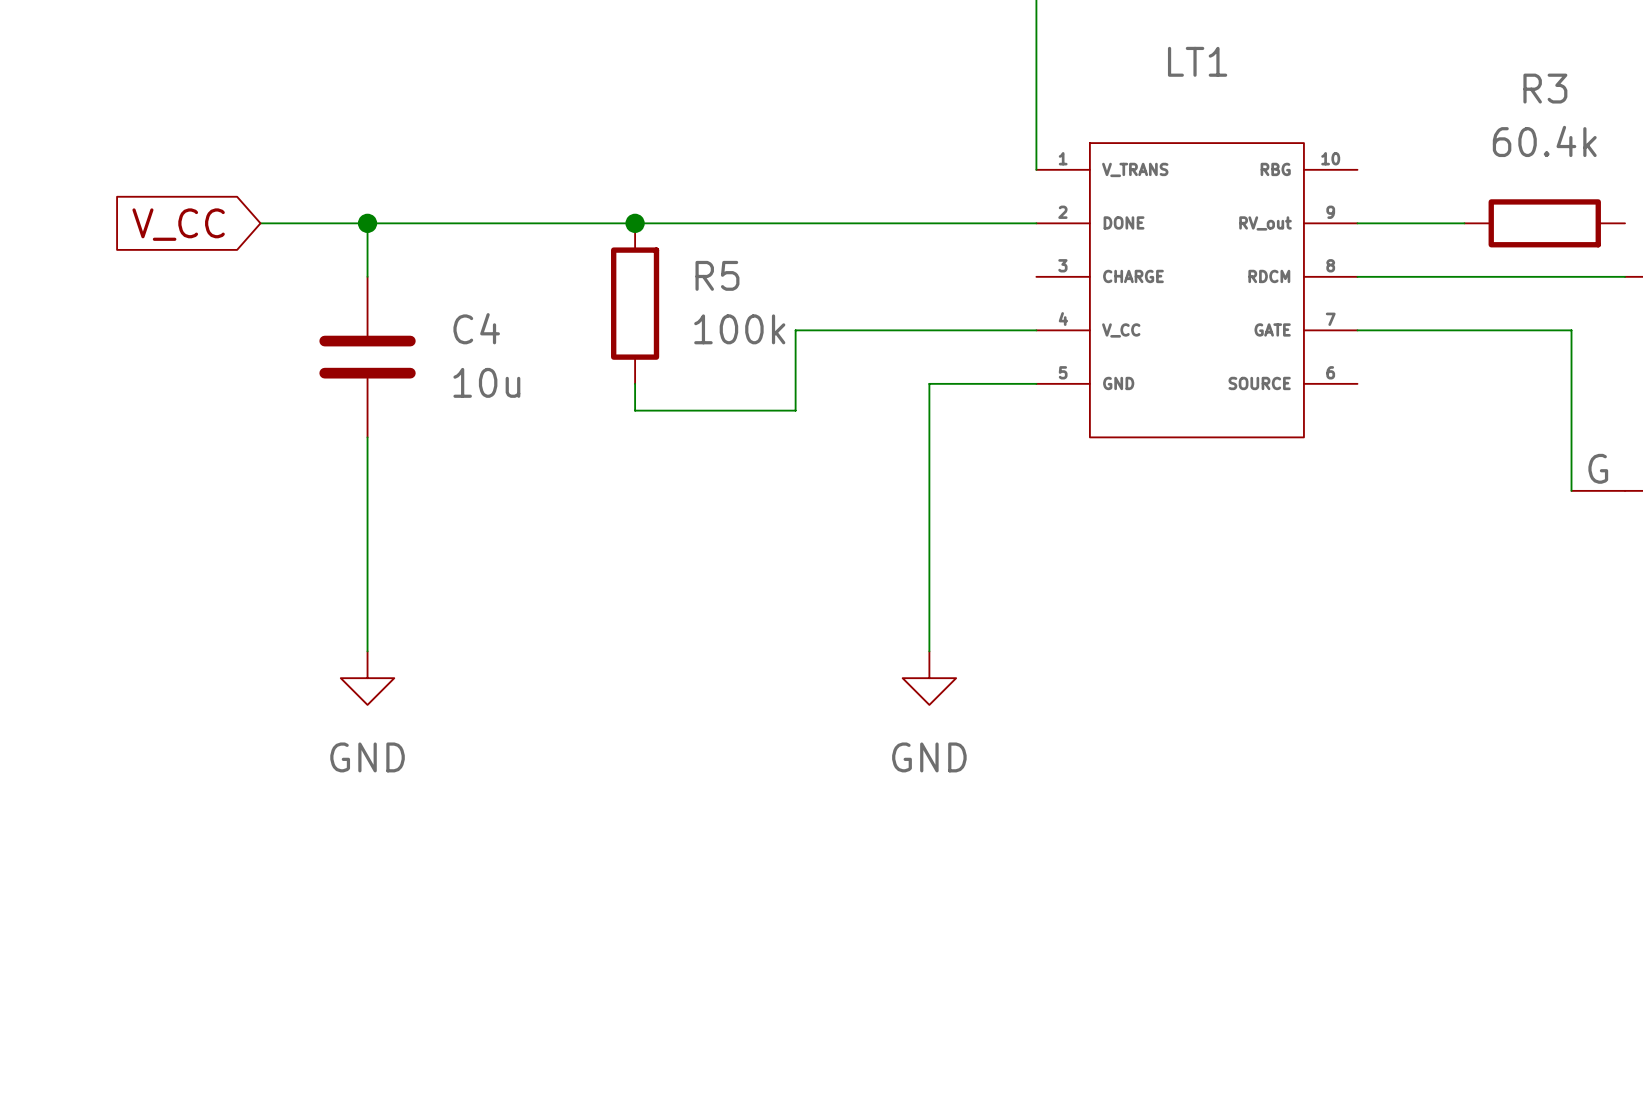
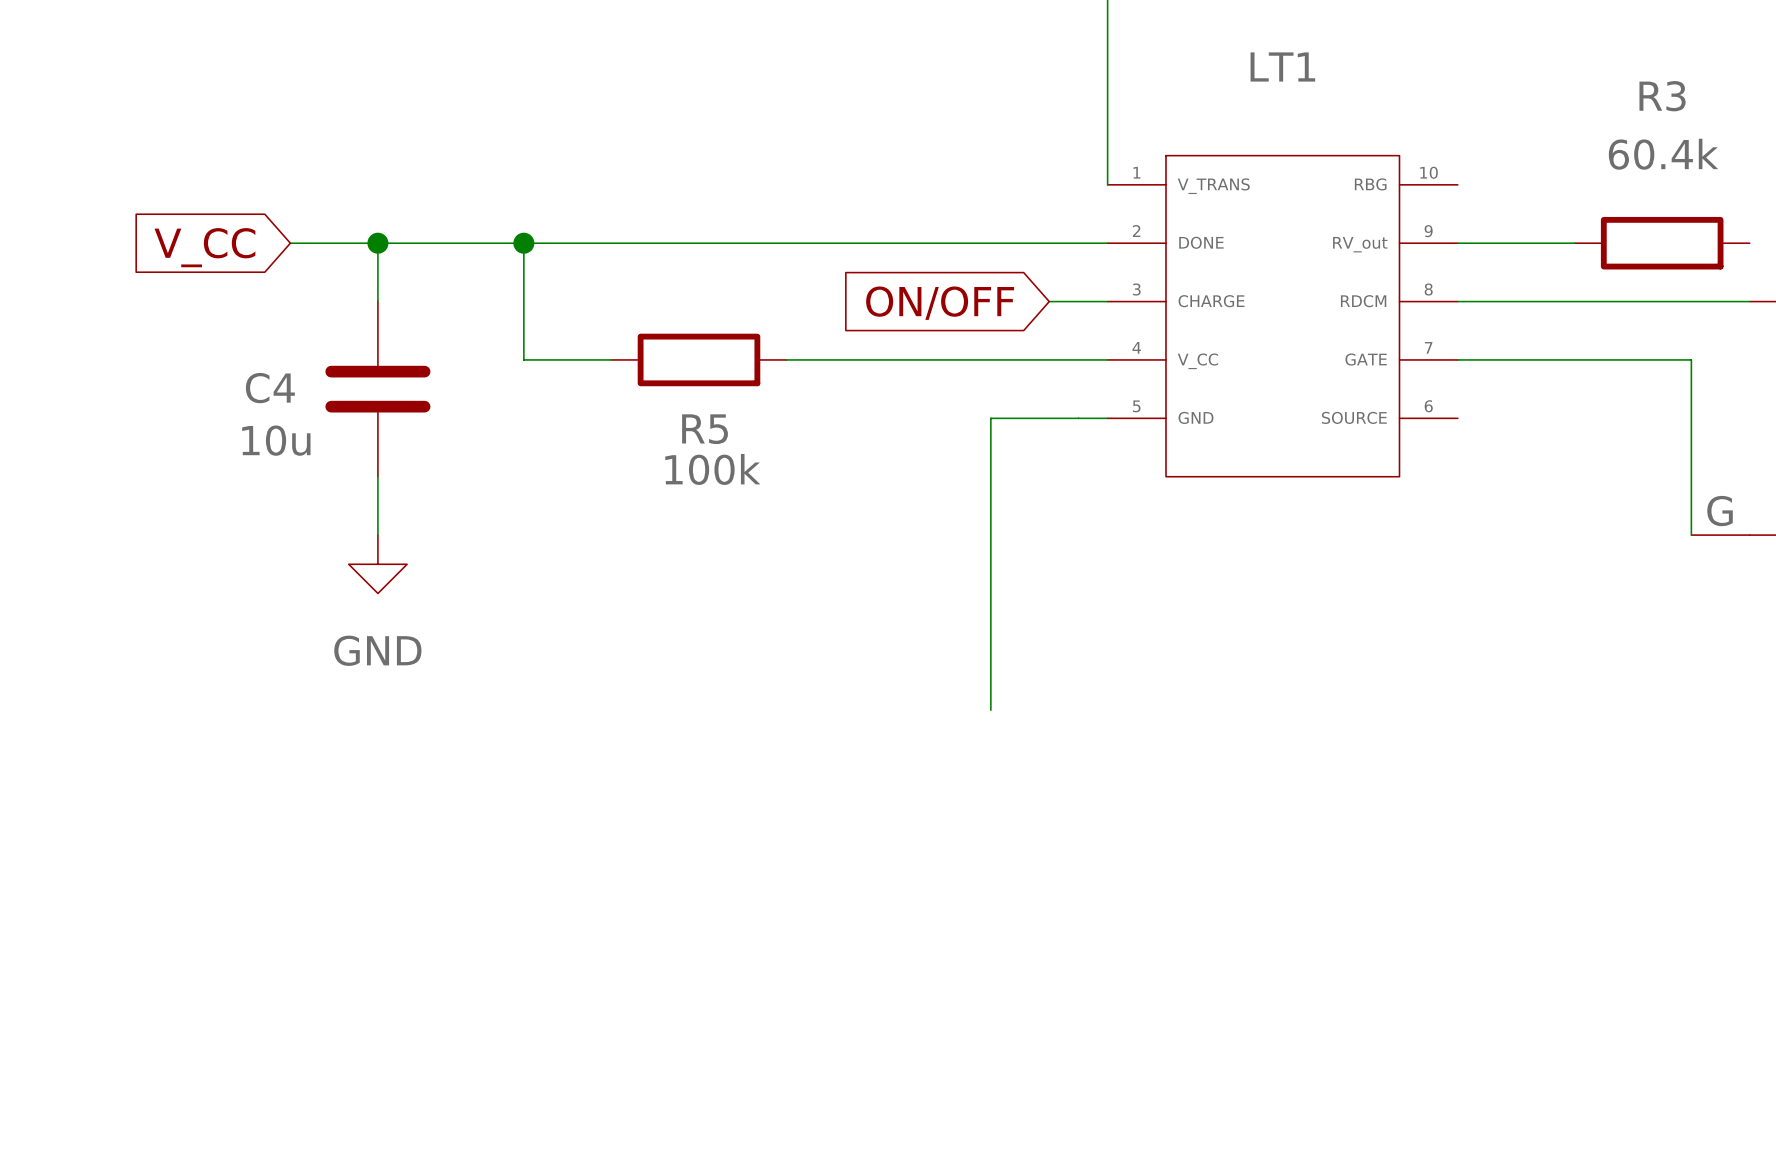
wire: (260, 223) (287, 223) -> none
wire: none -> (523, 243) (523, 359) (611, 359)
junction: none -> (523, 243)
junction: (635, 223) -> none
global label position: V_CC (178, 224) -> V_CC (204, 247)
wire: none -> (1049, 301) (1107, 301)
global label: none -> ON/OFF (940, 303)
R5 rotation: 0° (635, 303) -> 90° clockwise (698, 359)
C4 name position: C4 (476, 328) -> C4 (270, 388)
wire: (795, 330) (795, 410) (635, 410) (635, 383) -> (844, 359) (786, 359)
C4 value position: 10u (486, 382) -> 10u (276, 440)
wire: (367, 490) (367, 651) -> none
power symbol position: GND (367, 678) -> GND (377, 564)
power symbol: GND (929, 678) -> none

